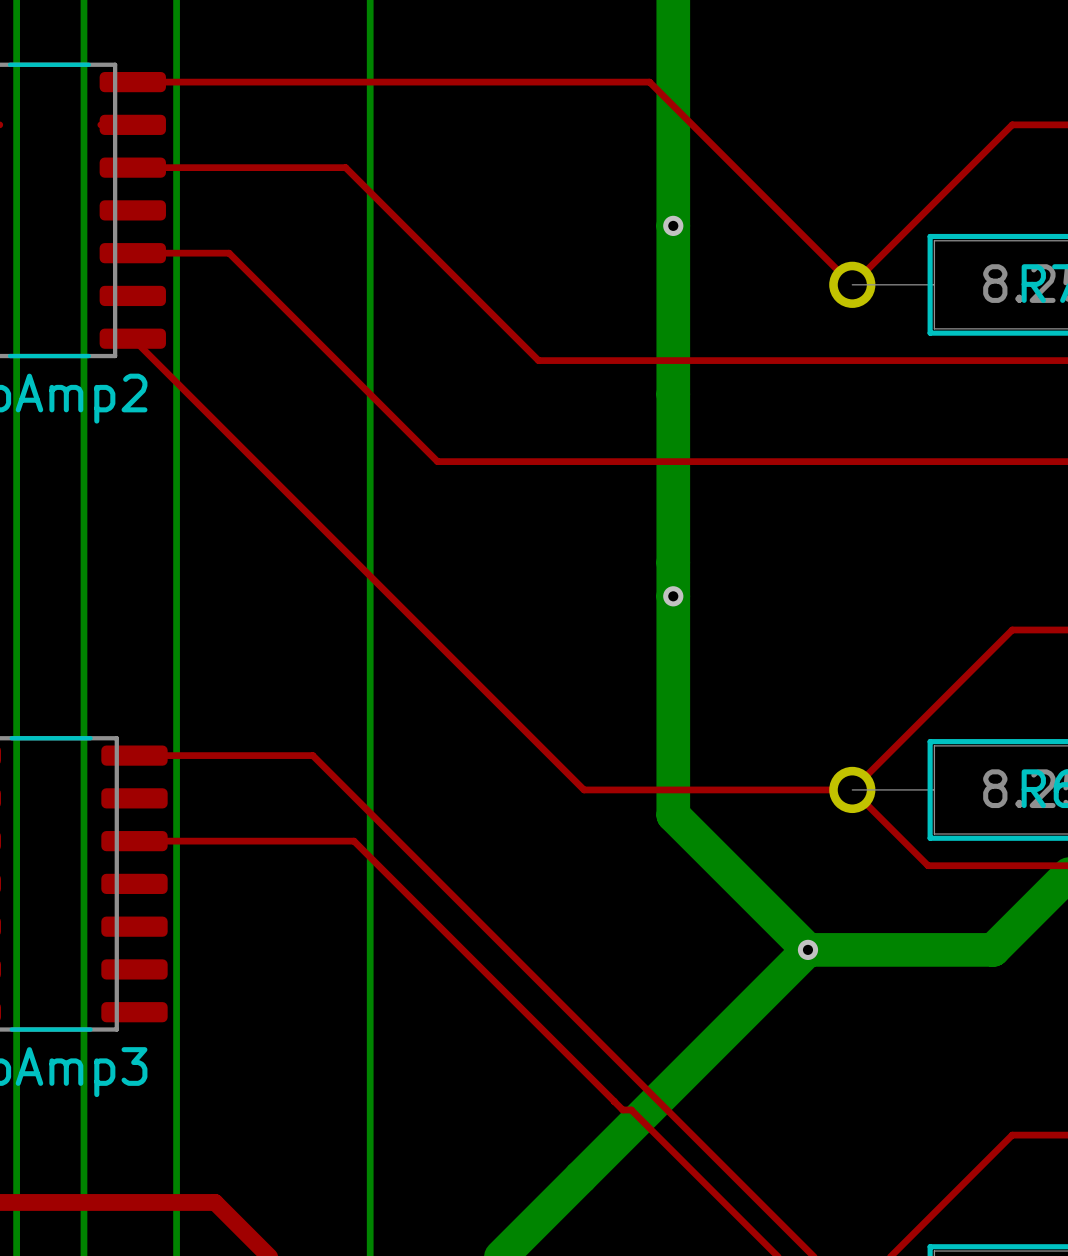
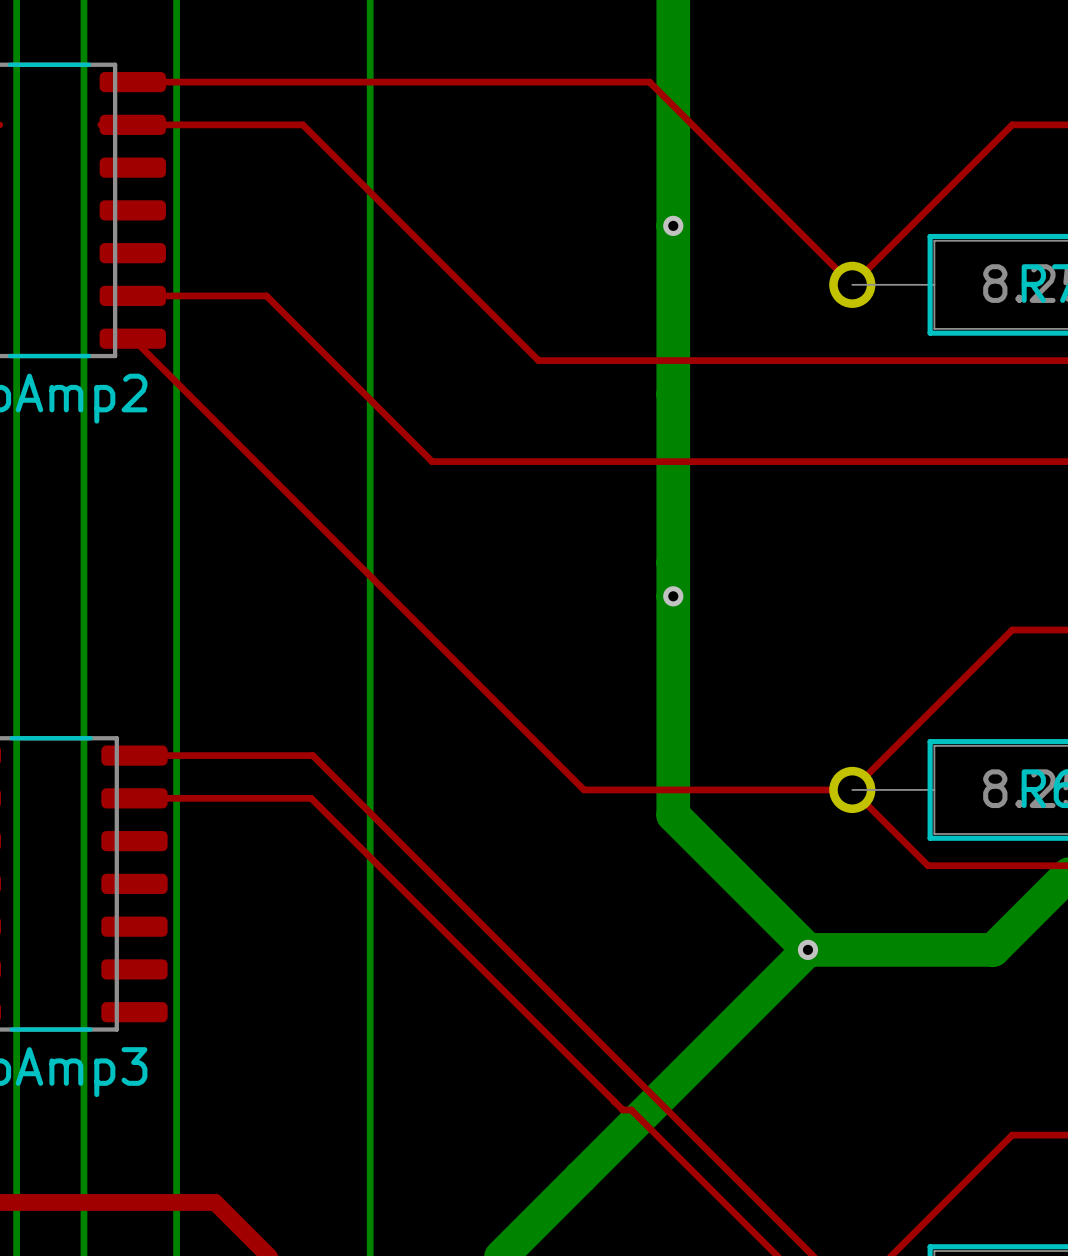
top track: (132, 167) (345, 167) -> (132, 124) (302, 124) (345, 167)
top track: (132, 253) (229, 253) (437, 461) -> (132, 295) (266, 295) (432, 461) (437, 461)
top track: (134, 841) (354, 841) -> (134, 798) (311, 798) (354, 841)

